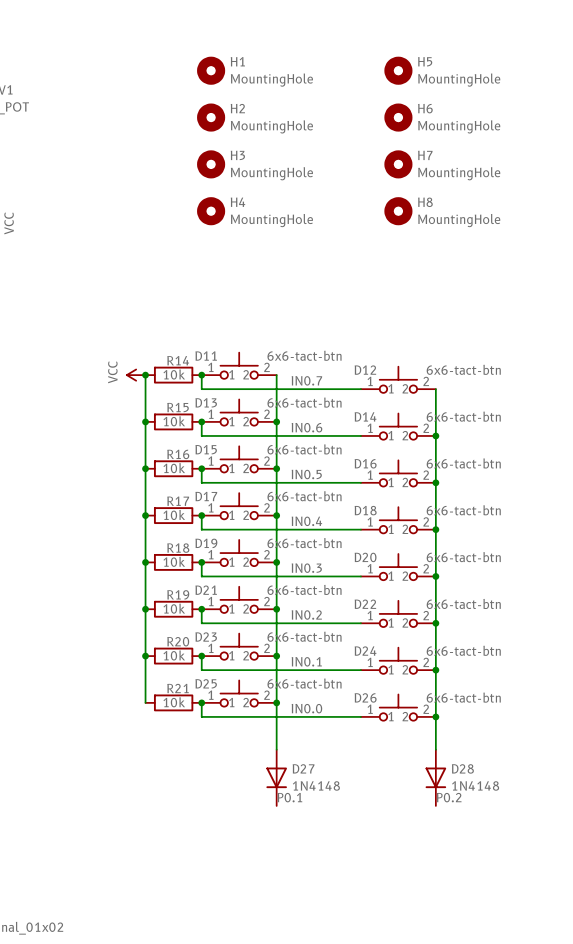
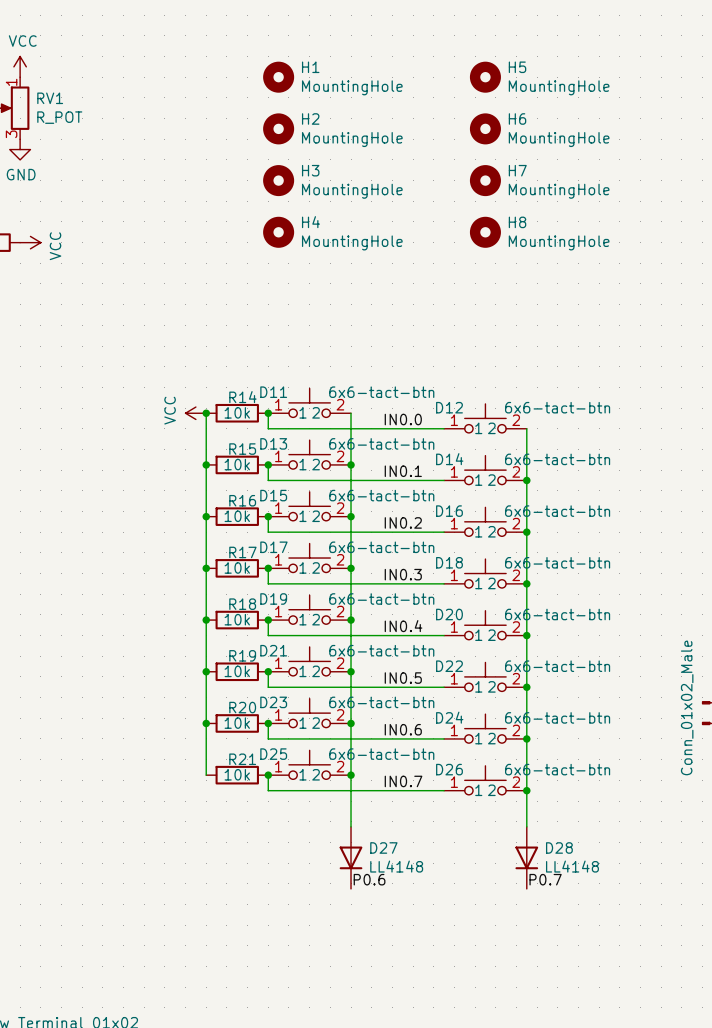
label: IN0.7 (306, 380) -> IN0.0 (403, 419)
label: IN0.6 (306, 427) -> IN0.1 (403, 471)
label position: IN0.5 (306, 474) -> IN0.5 (403, 678)
label position: IN0.4 (306, 521) -> IN0.4 (403, 626)
label position: IN0.3 (306, 568) -> IN0.3 (403, 574)
label position: IN0.2 (306, 614) -> IN0.2 (403, 522)
label: IN0.1 (306, 661) -> IN0.6 (403, 729)
label: IN0.0 (306, 708) -> IN0.7 (403, 781)
D27 value: 1N4148 (316, 785) -> LL4148 (396, 866)
D28 value: 1N4148 (475, 785) -> LL4148 (572, 866)
label: P0.1 (289, 797) -> P0.6 (369, 879)
label: P0.2 (449, 797) -> P0.7 (545, 879)

